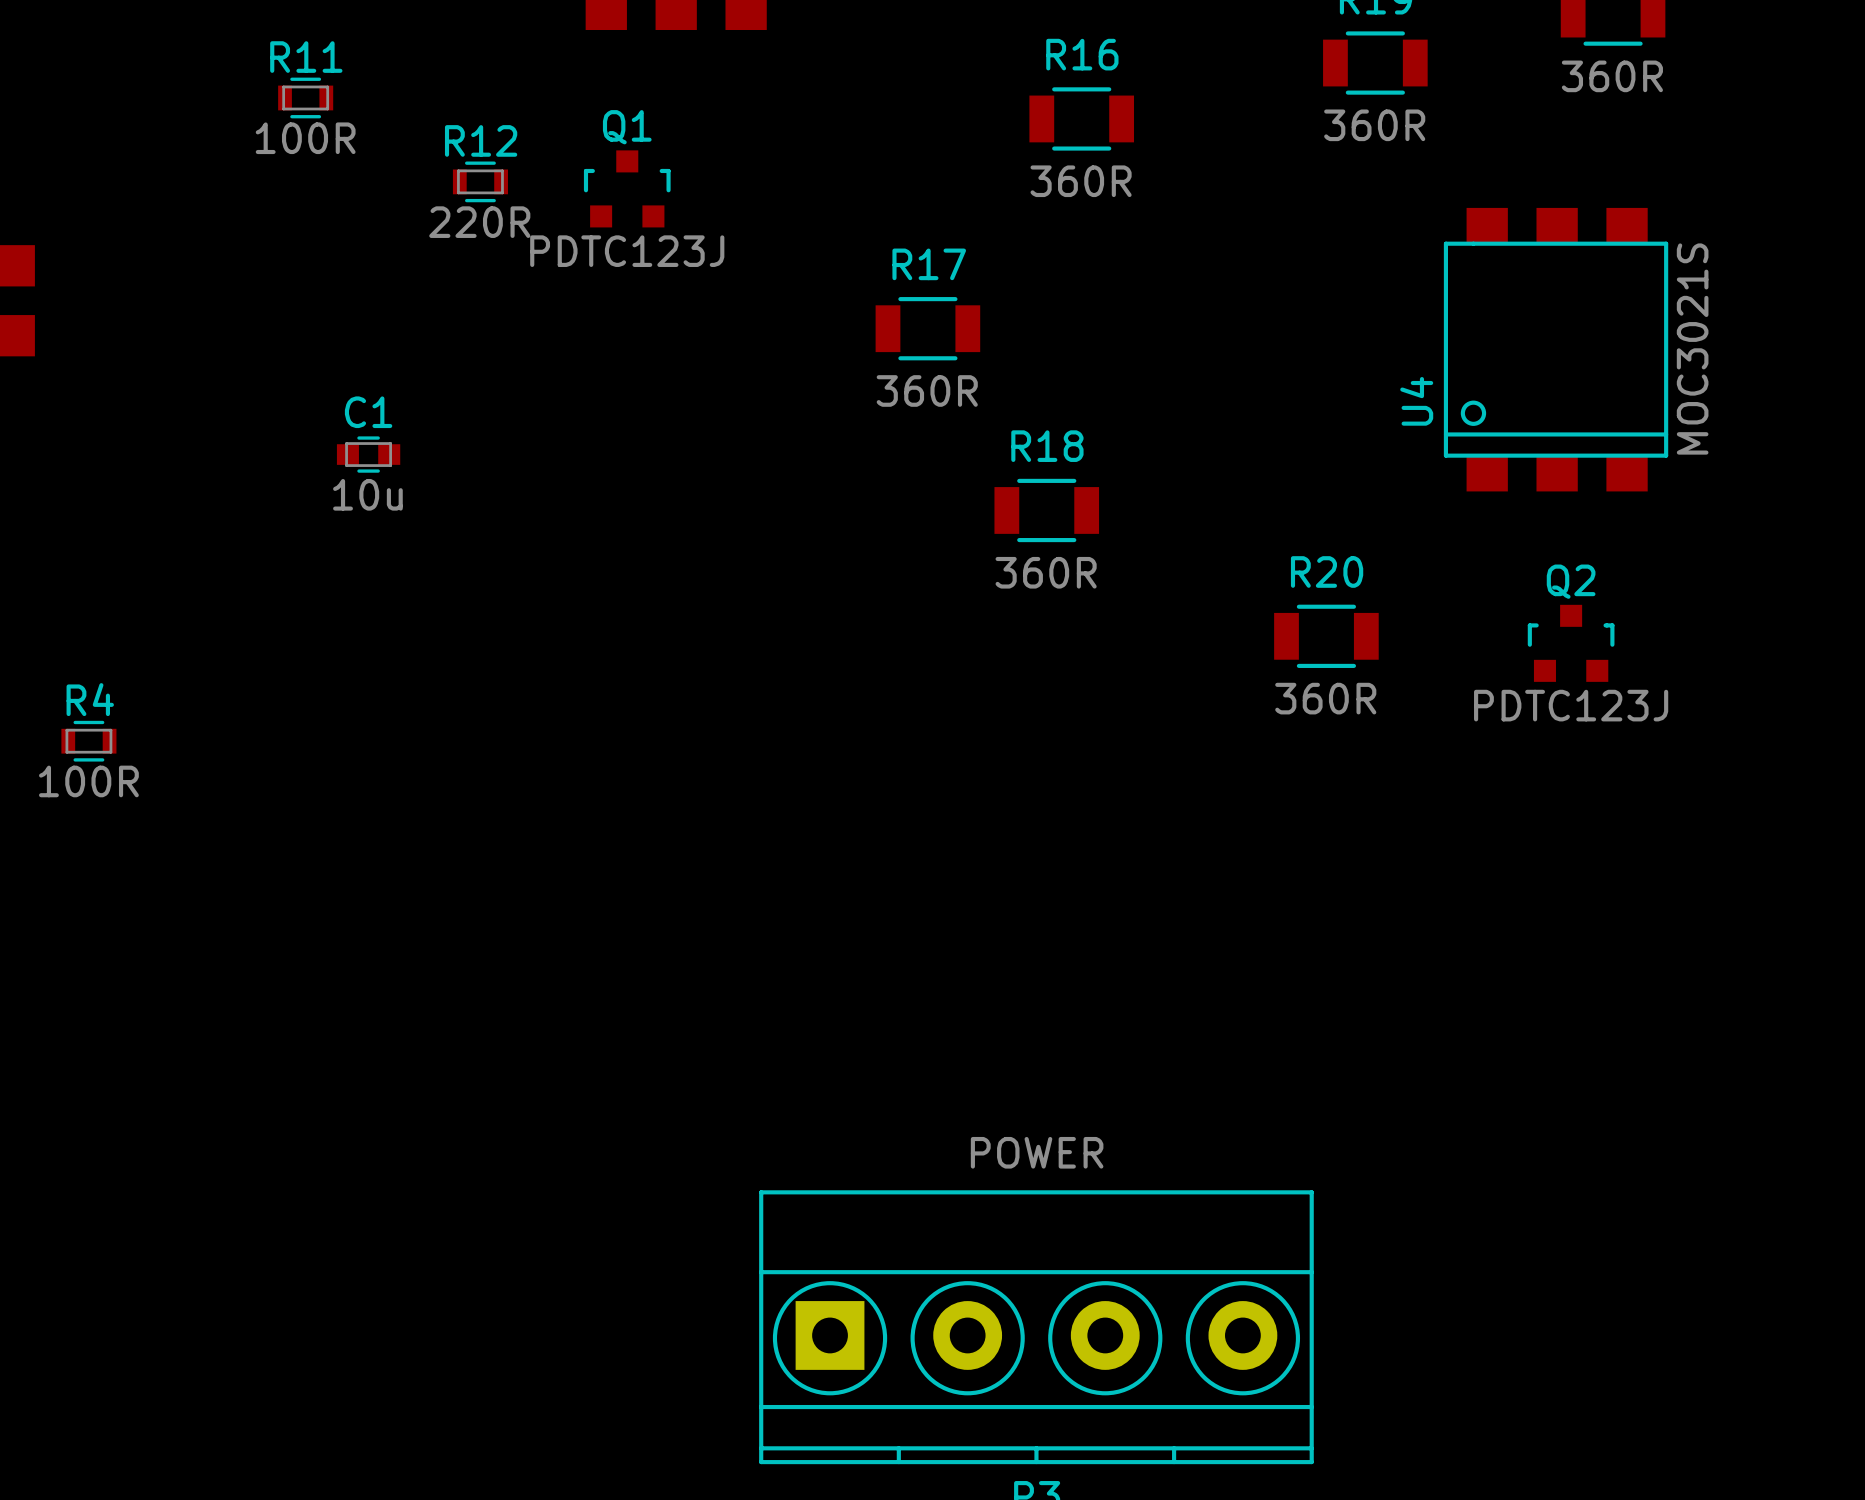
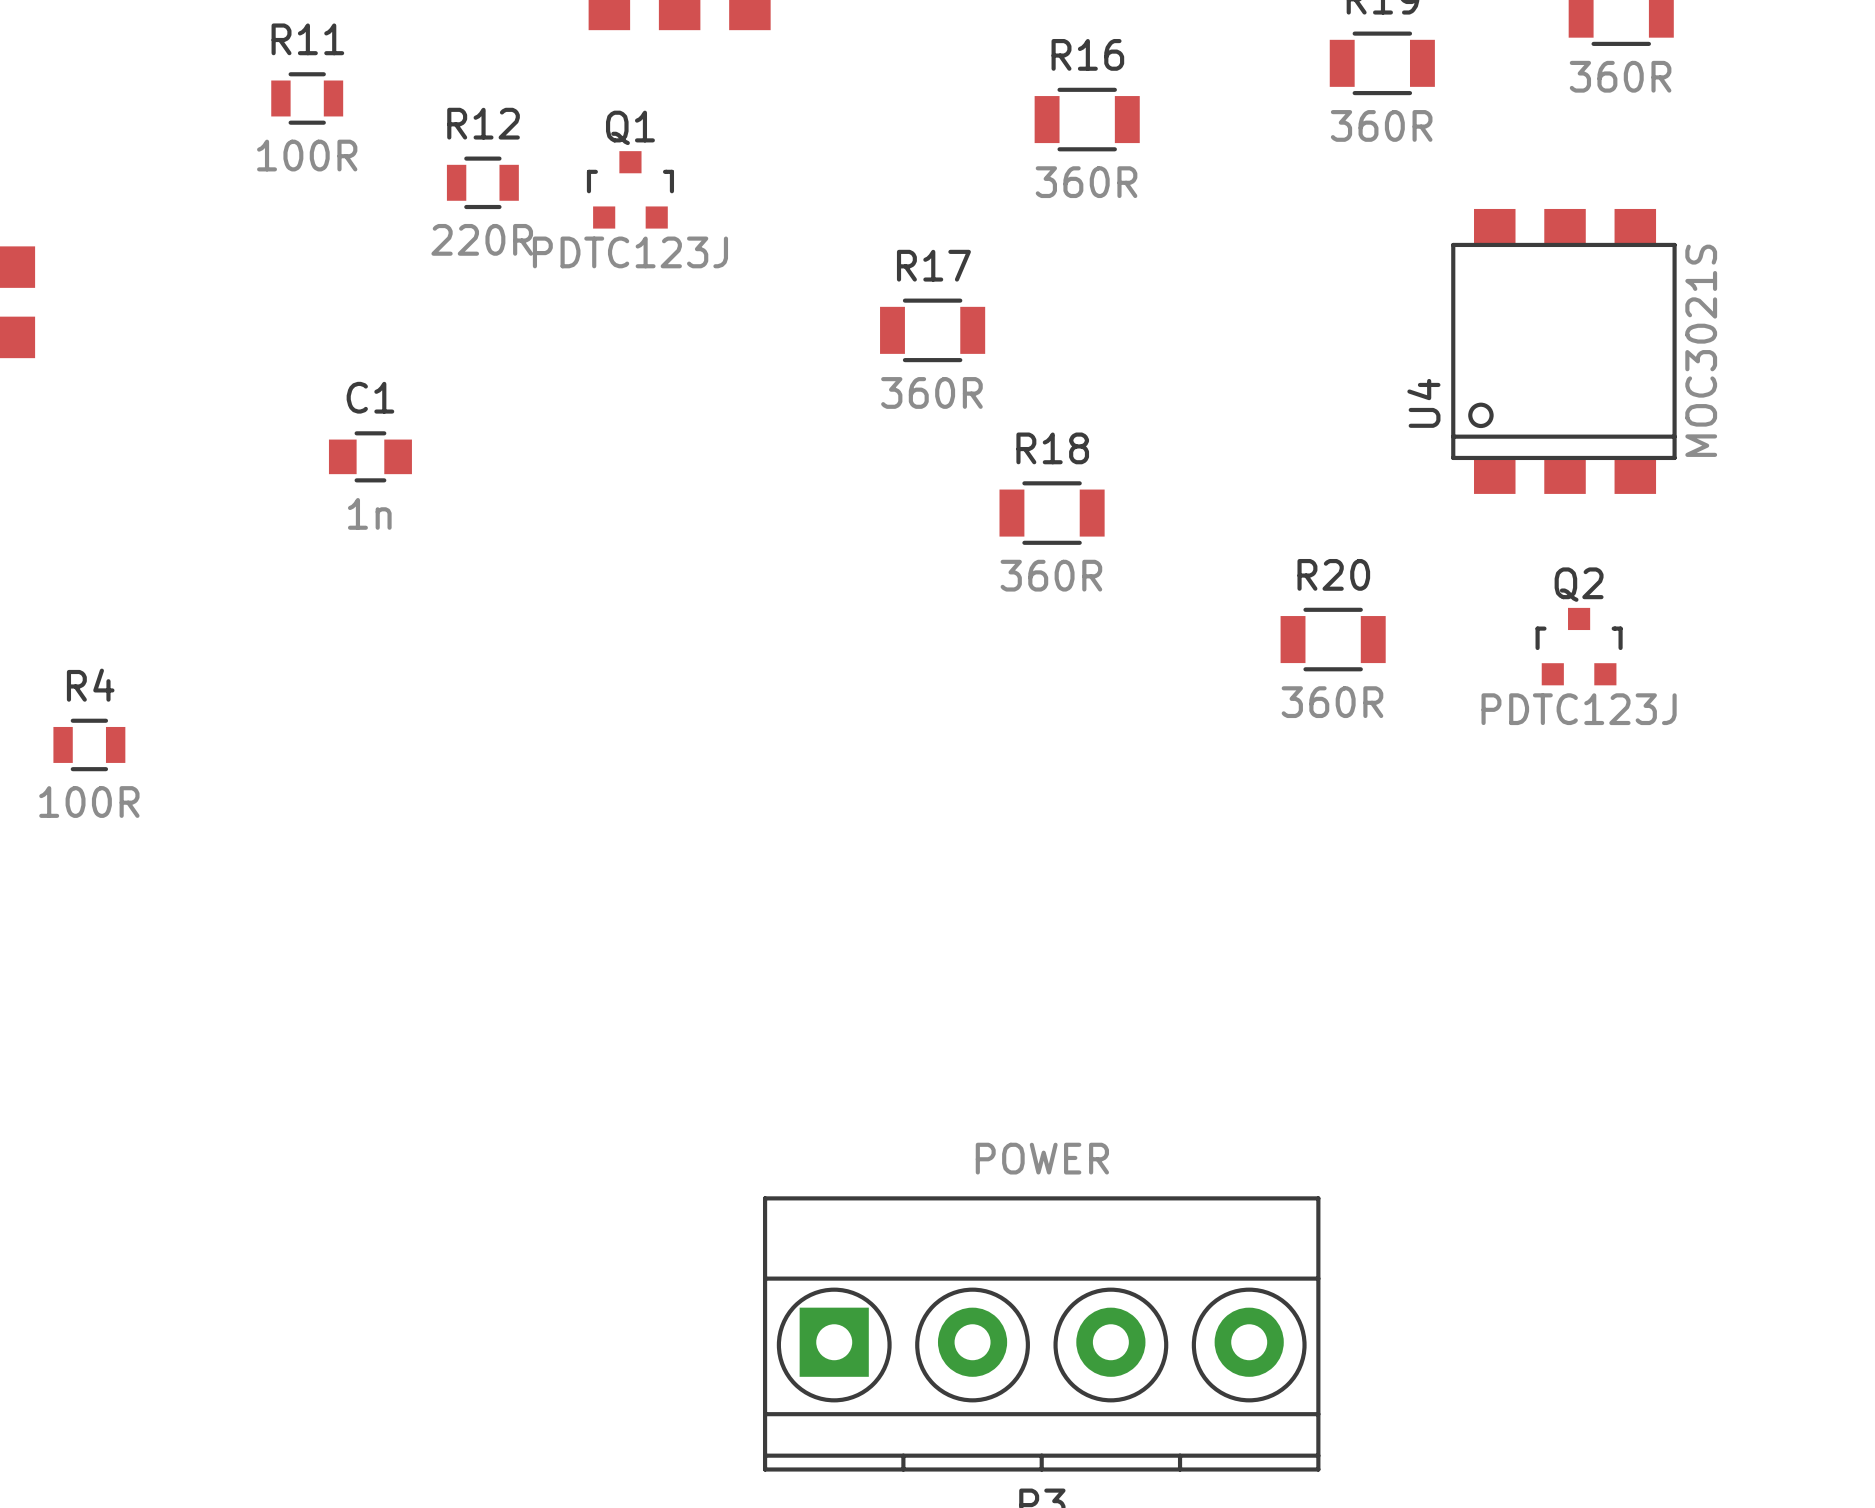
R11 footprint: [278, 77, 334, 119] -> [271, 72, 344, 125]
R12 footprint: [452, 161, 508, 203] -> [446, 156, 519, 210]
C1 footprint: [336, 436, 401, 473] -> [328, 431, 412, 483]
C1 value: 10u (367, 494) -> 1n (369, 513)
R4 footprint: [61, 720, 117, 762] -> [53, 718, 126, 772]

